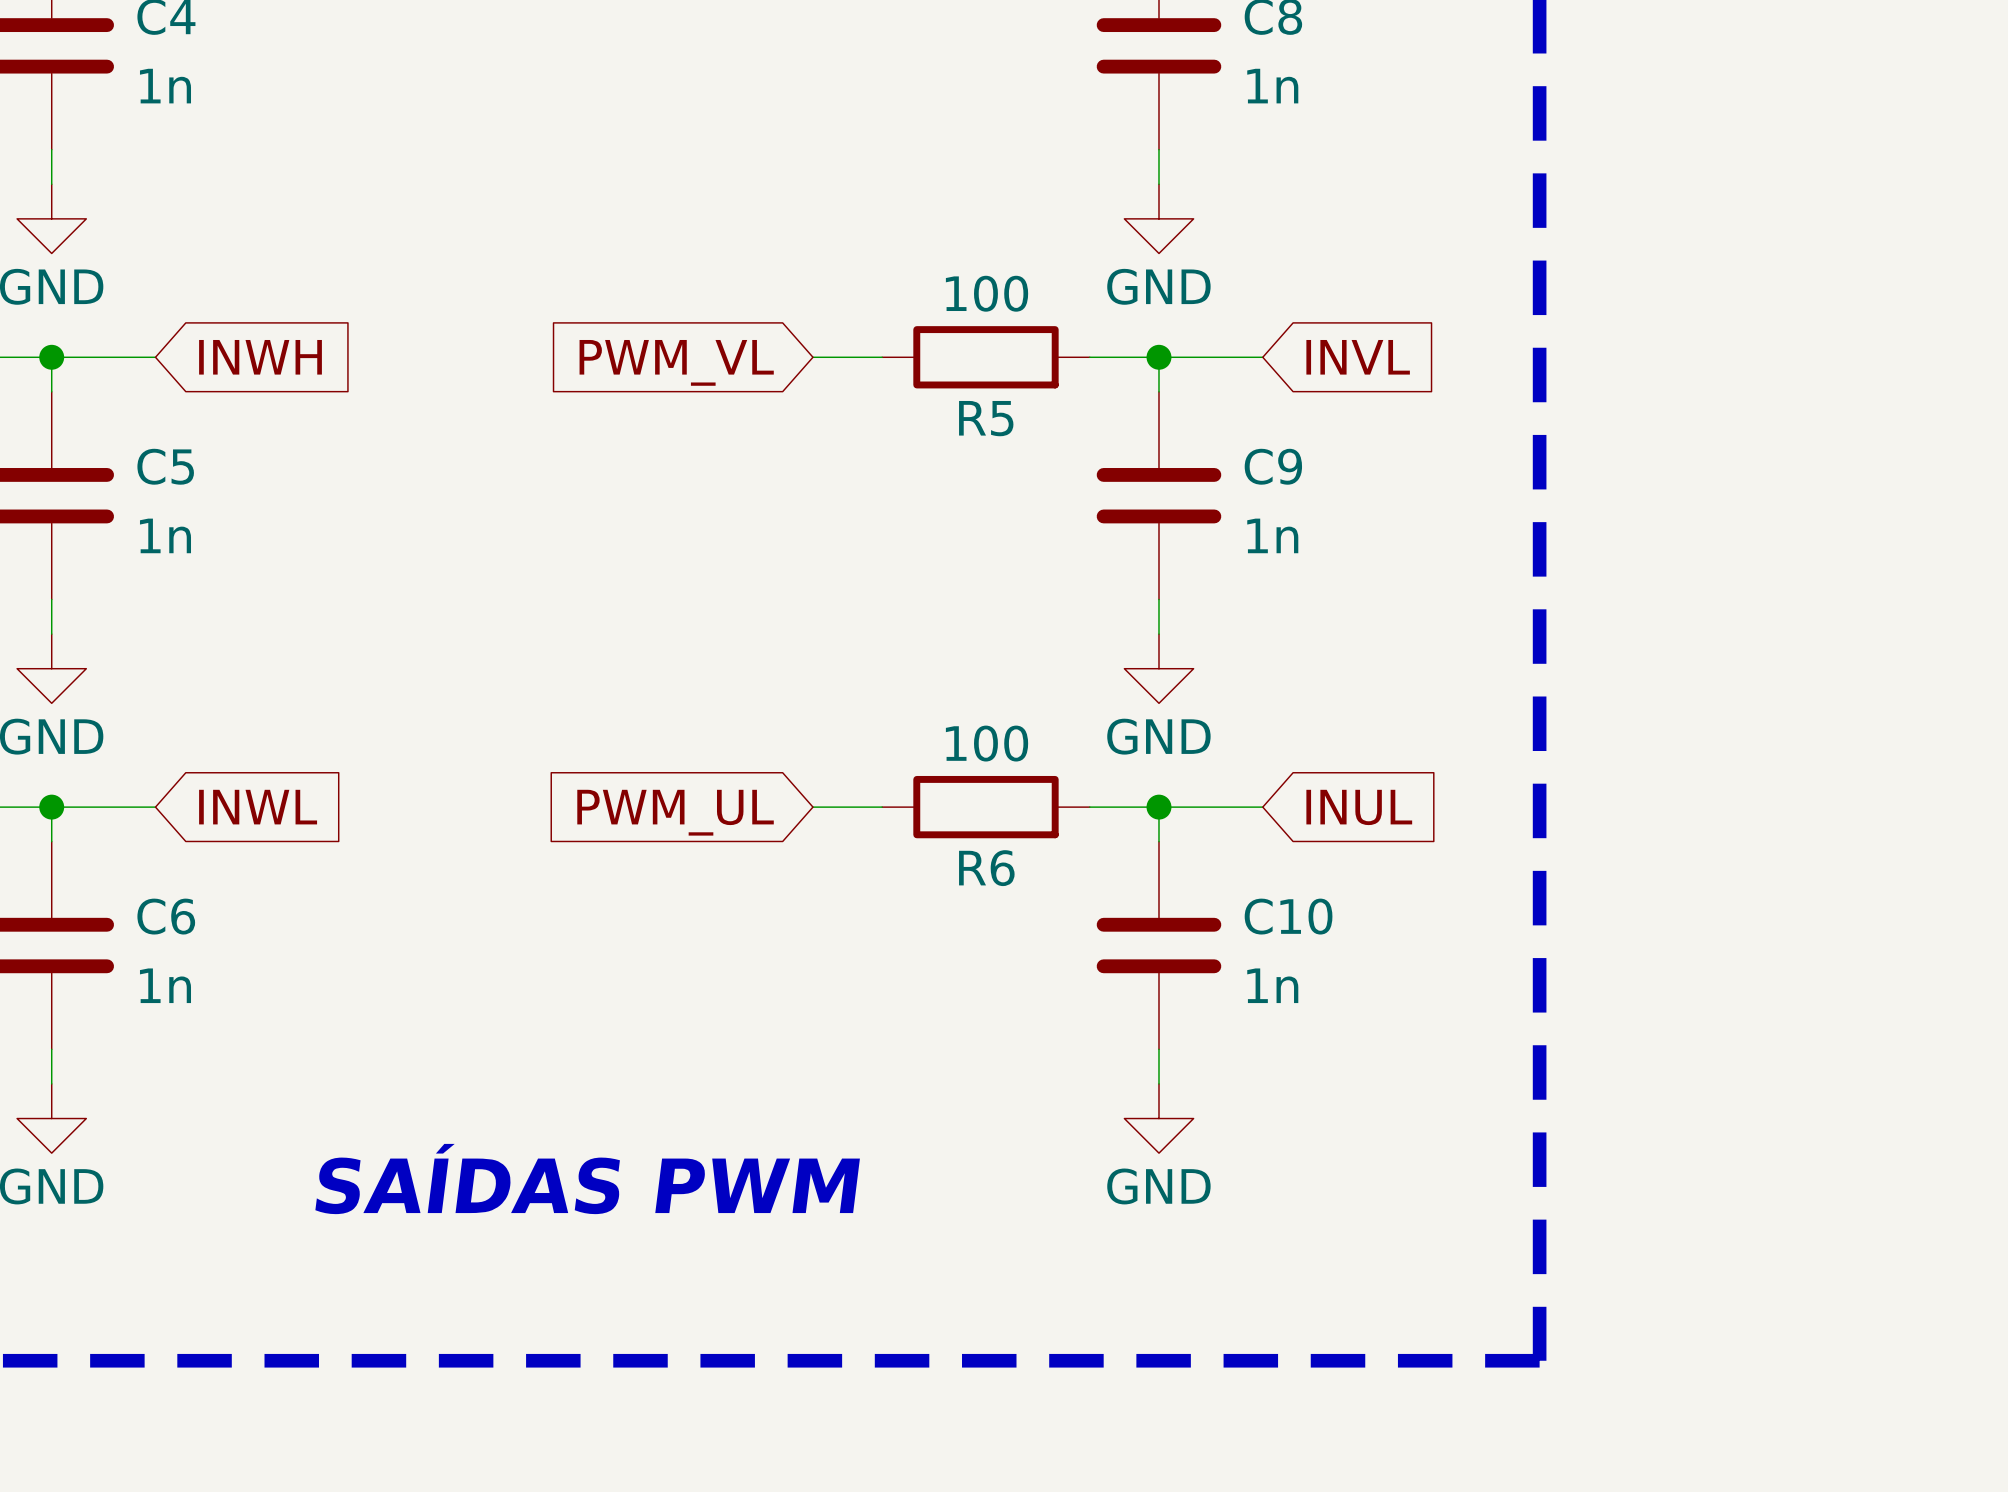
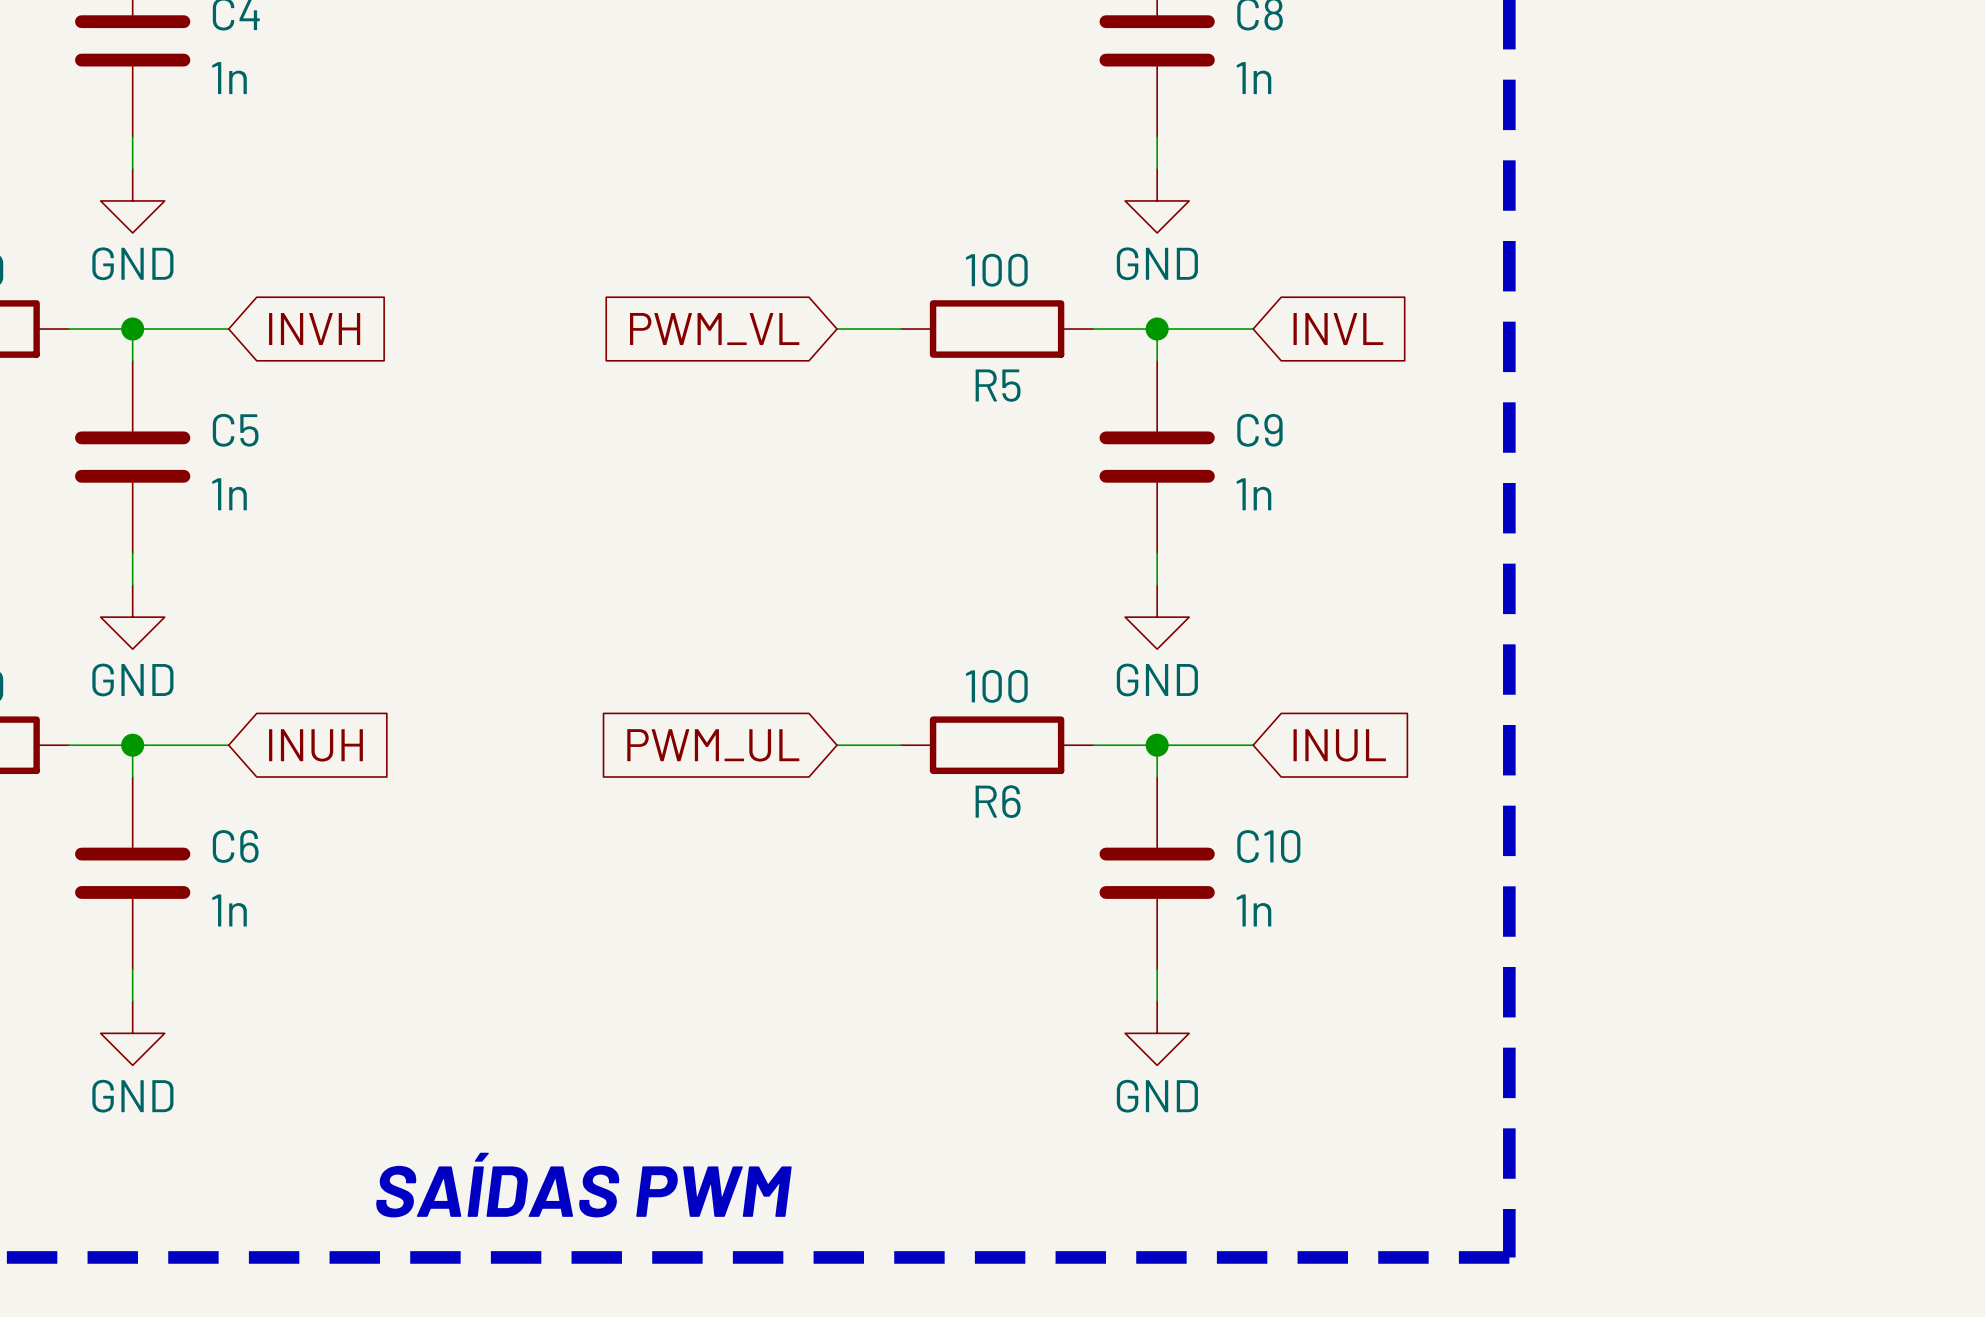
global label: INWH (260, 357) -> INVH (314, 329)
global label: INWL (258, 807) -> INUH (315, 745)
text position: SAÍDAS PWM (587, 1179) -> SAÍDAS PWM (583, 1185)

